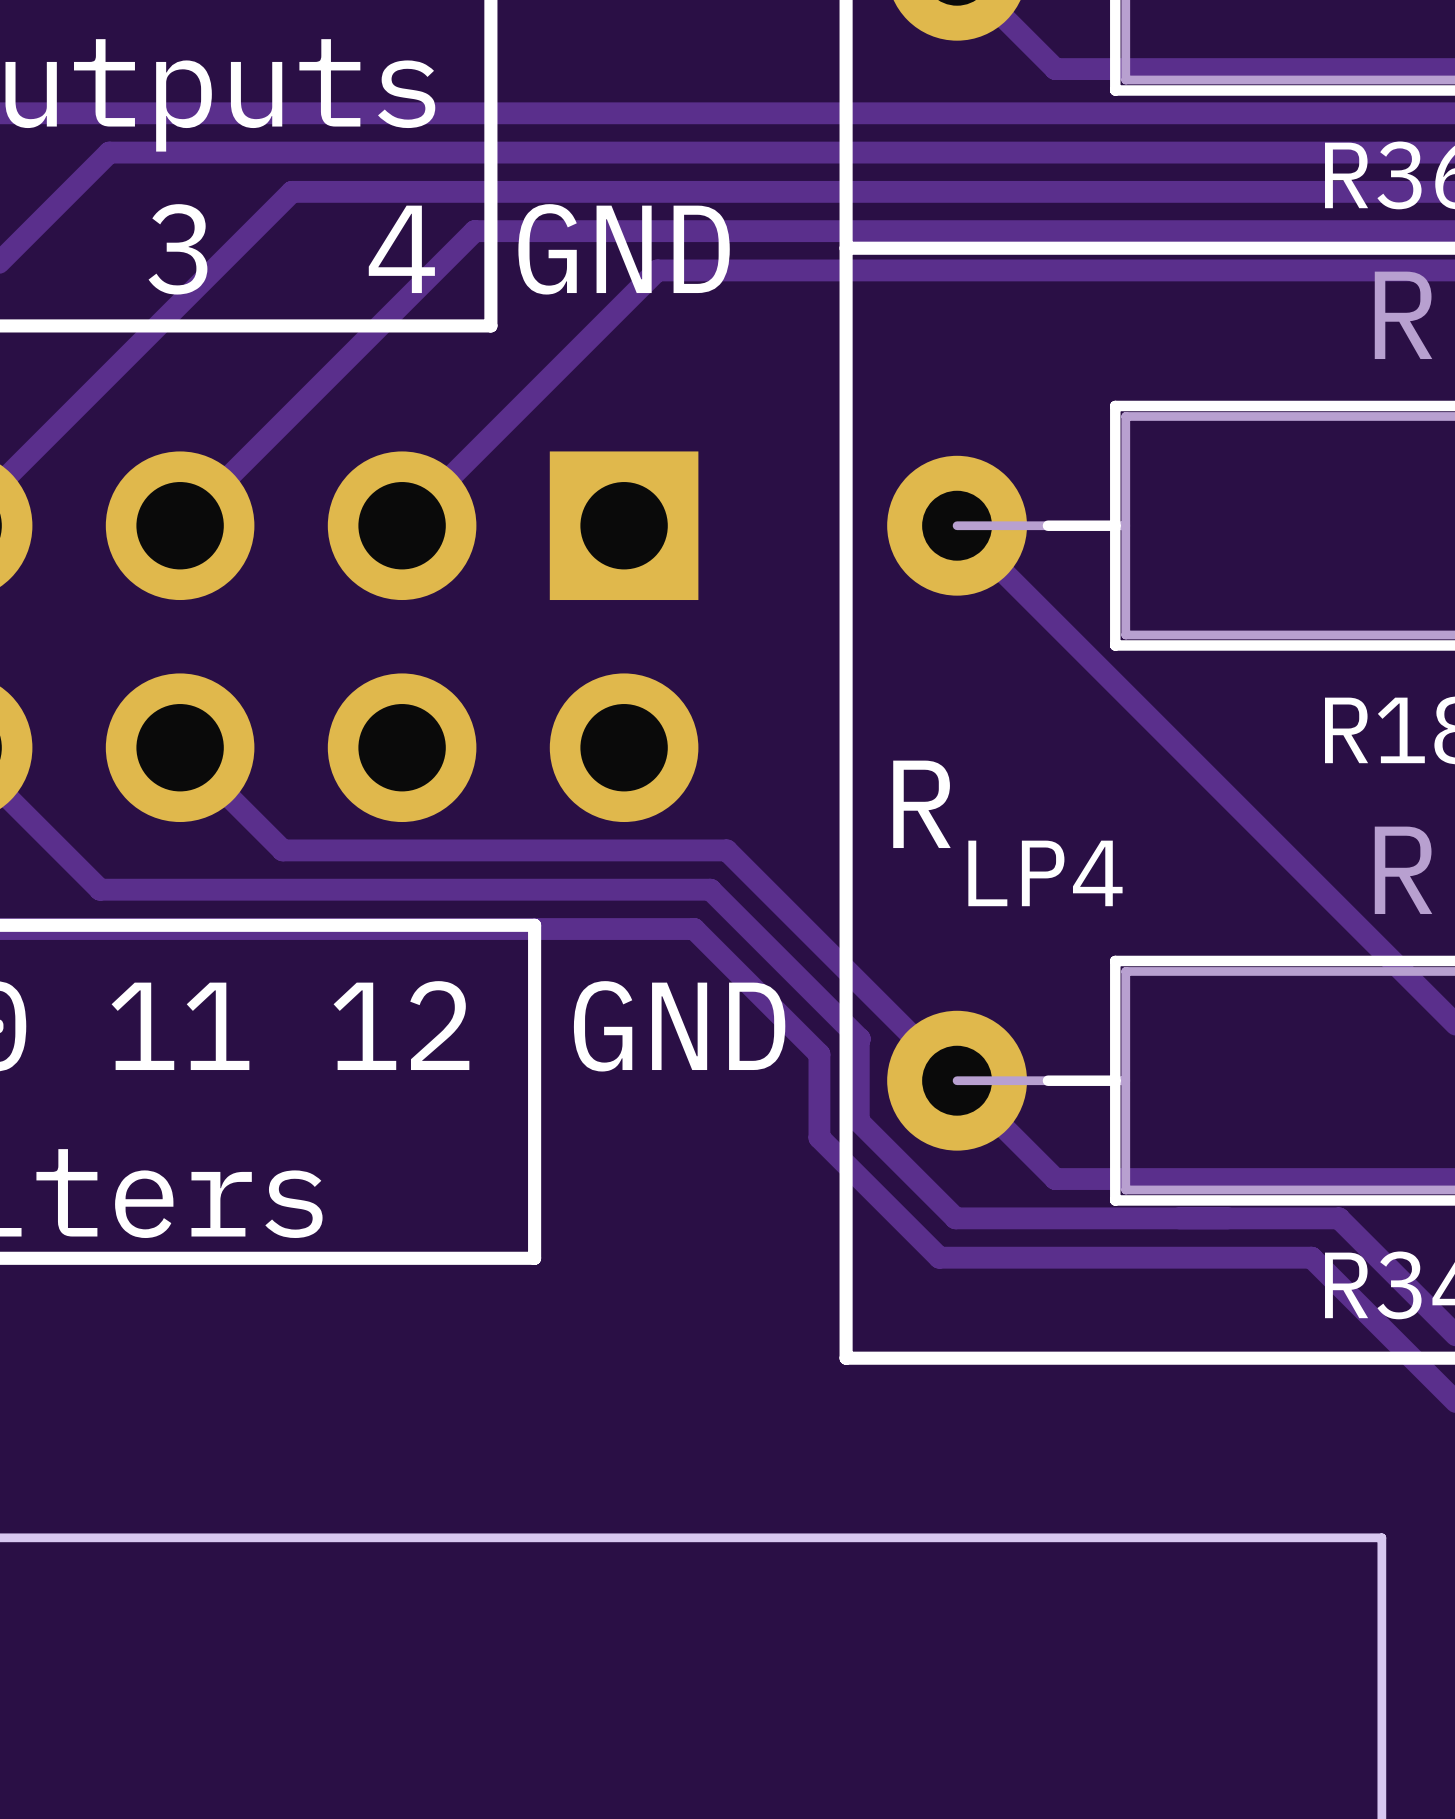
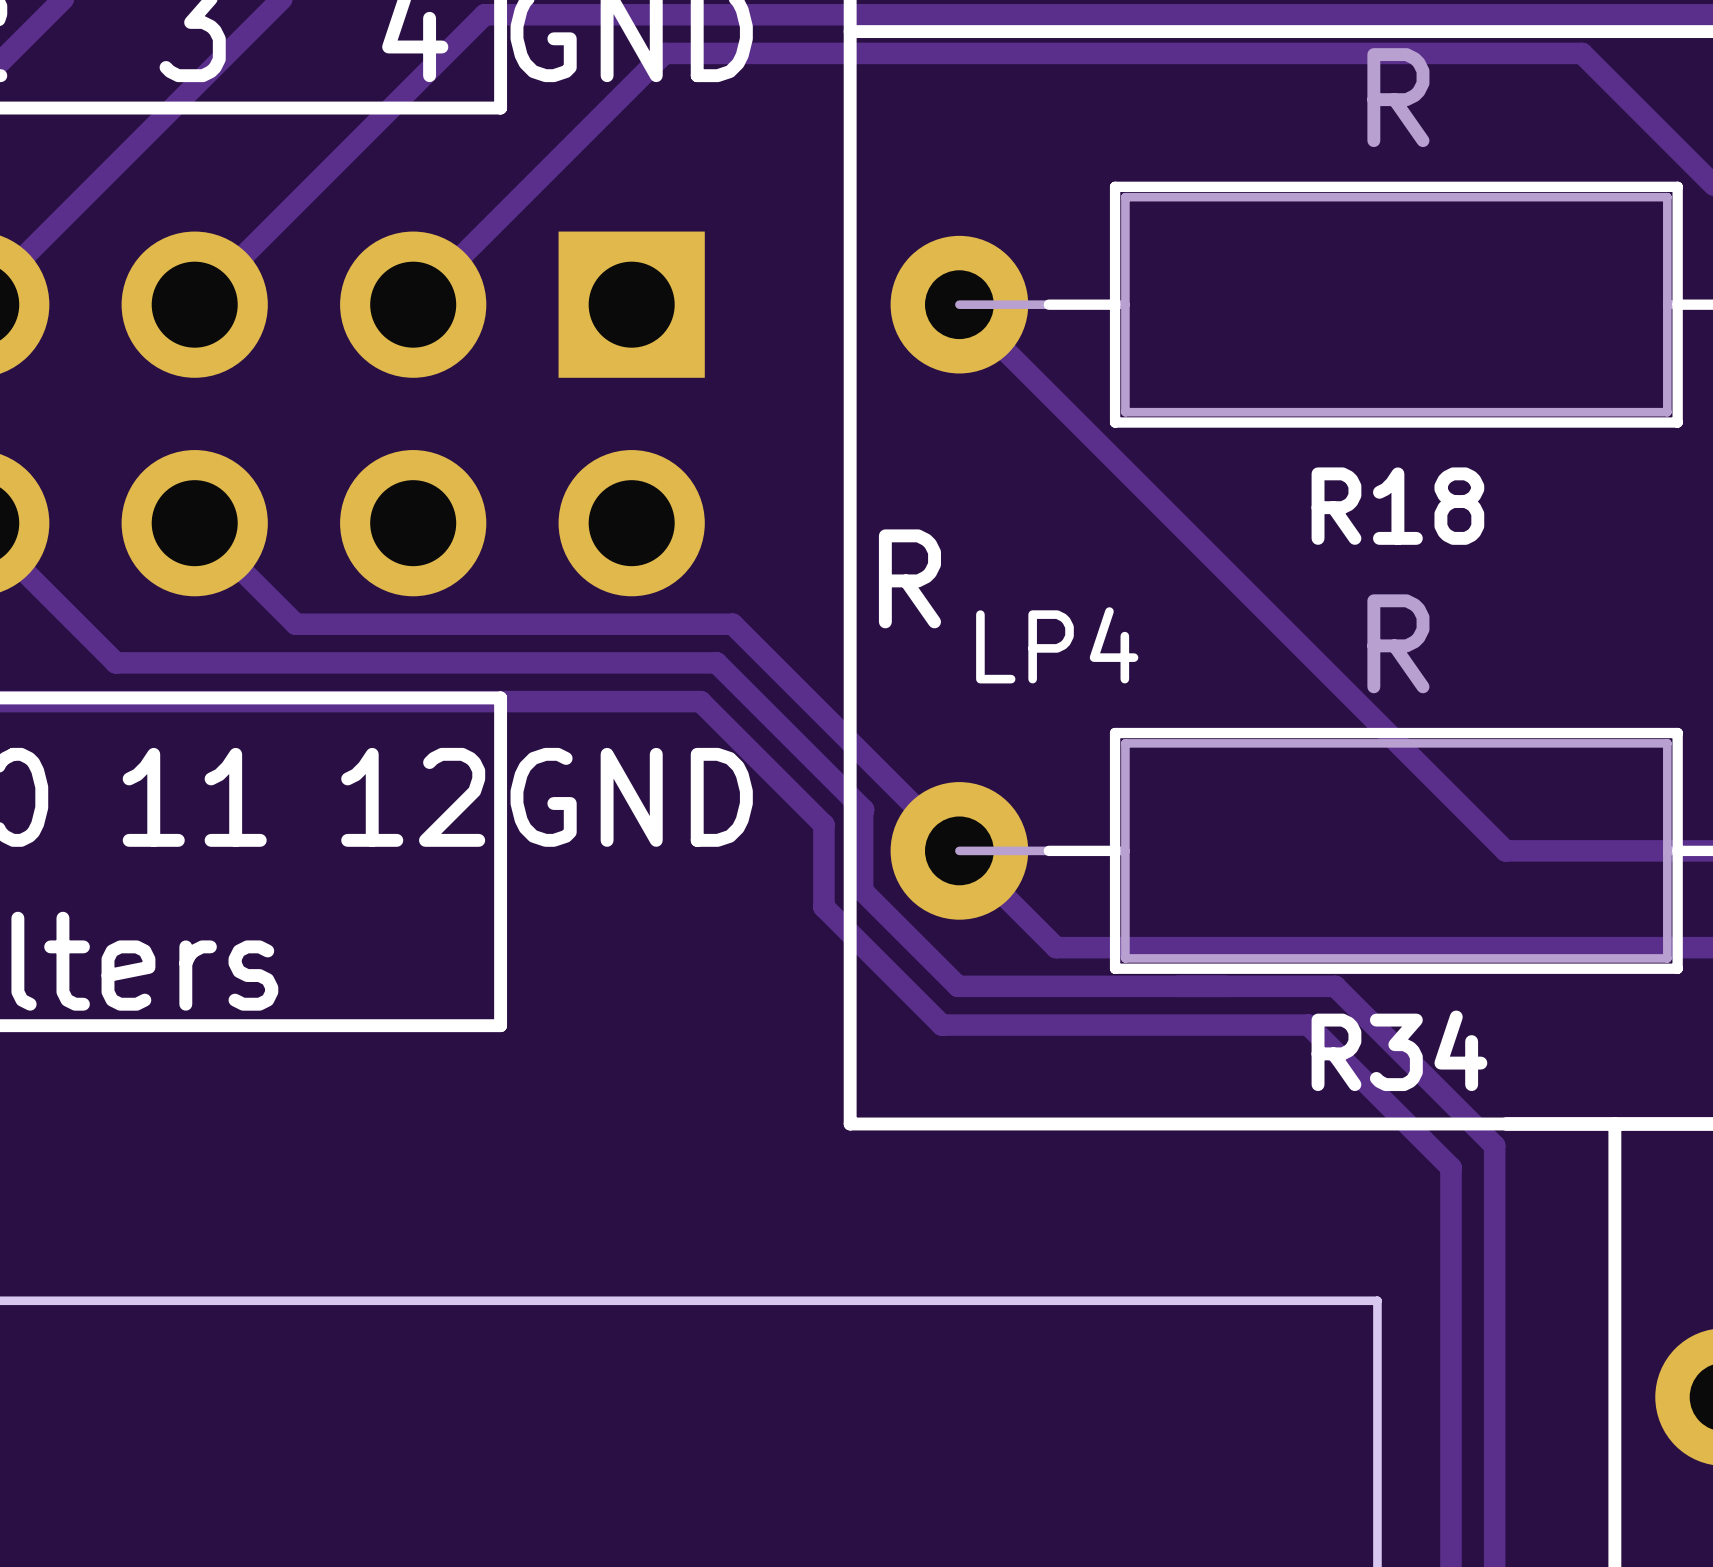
line: (490, 925) (534, 925) (534, 1258) (490, 1258) -> (500, 697) (500, 1025)
text position: GND (679, 1026) -> GND (631, 797)

